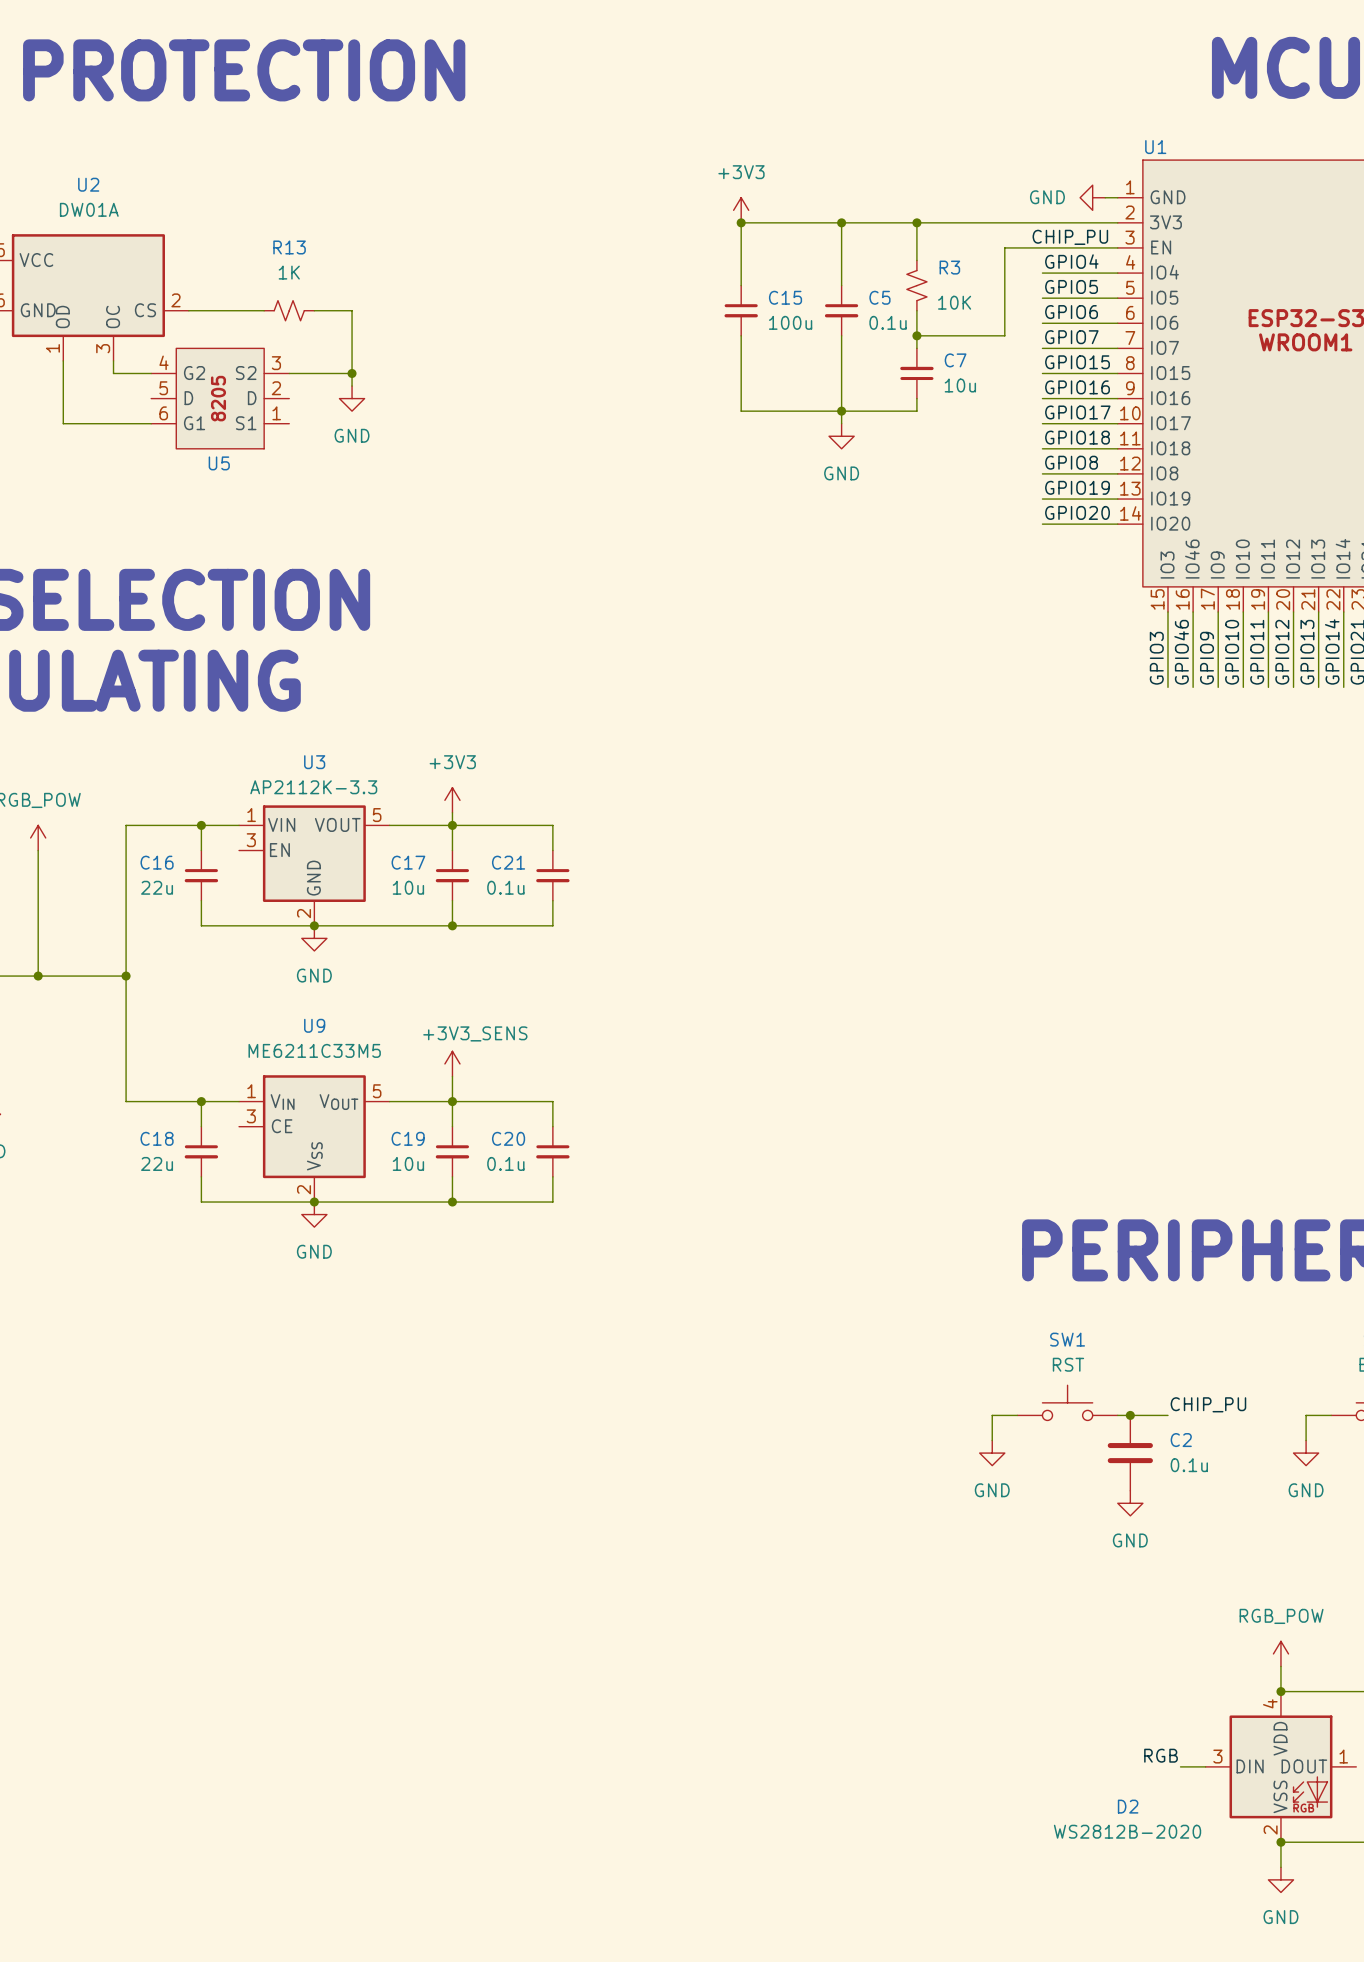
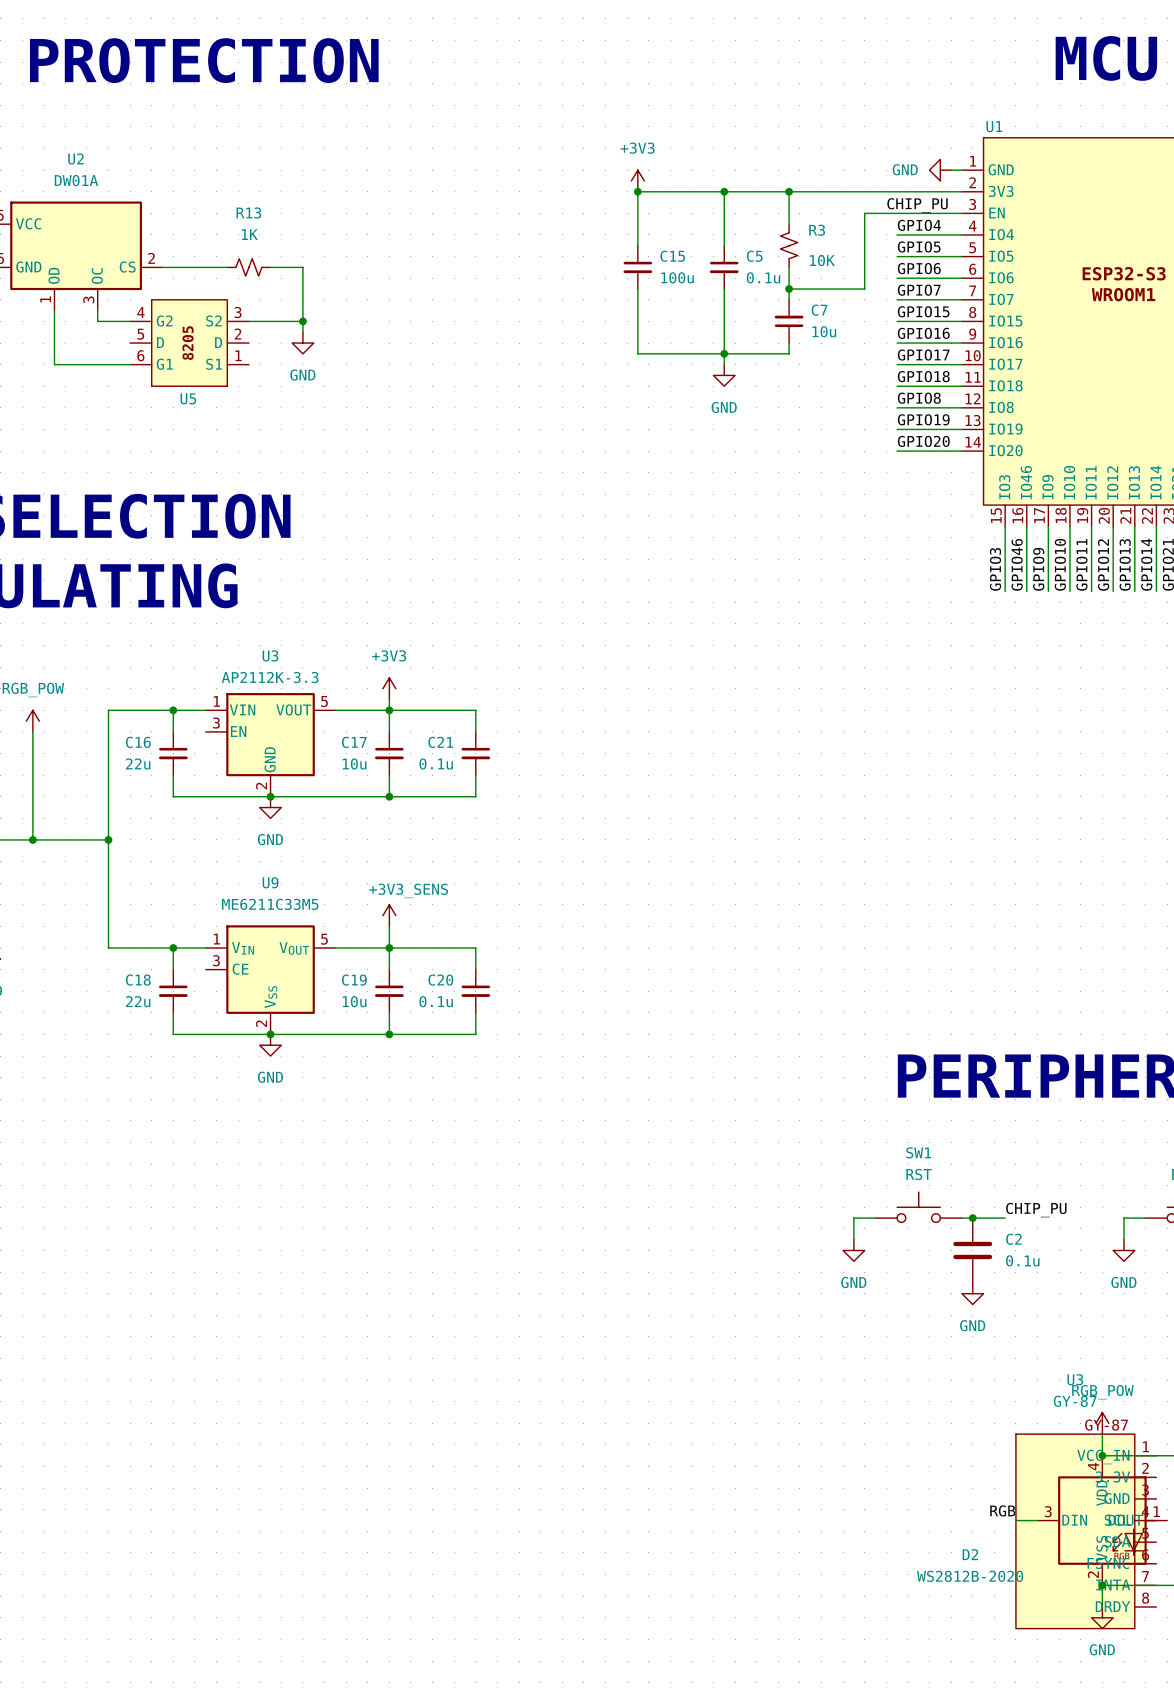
U3: none -> GY-87 (1086, 1531)

